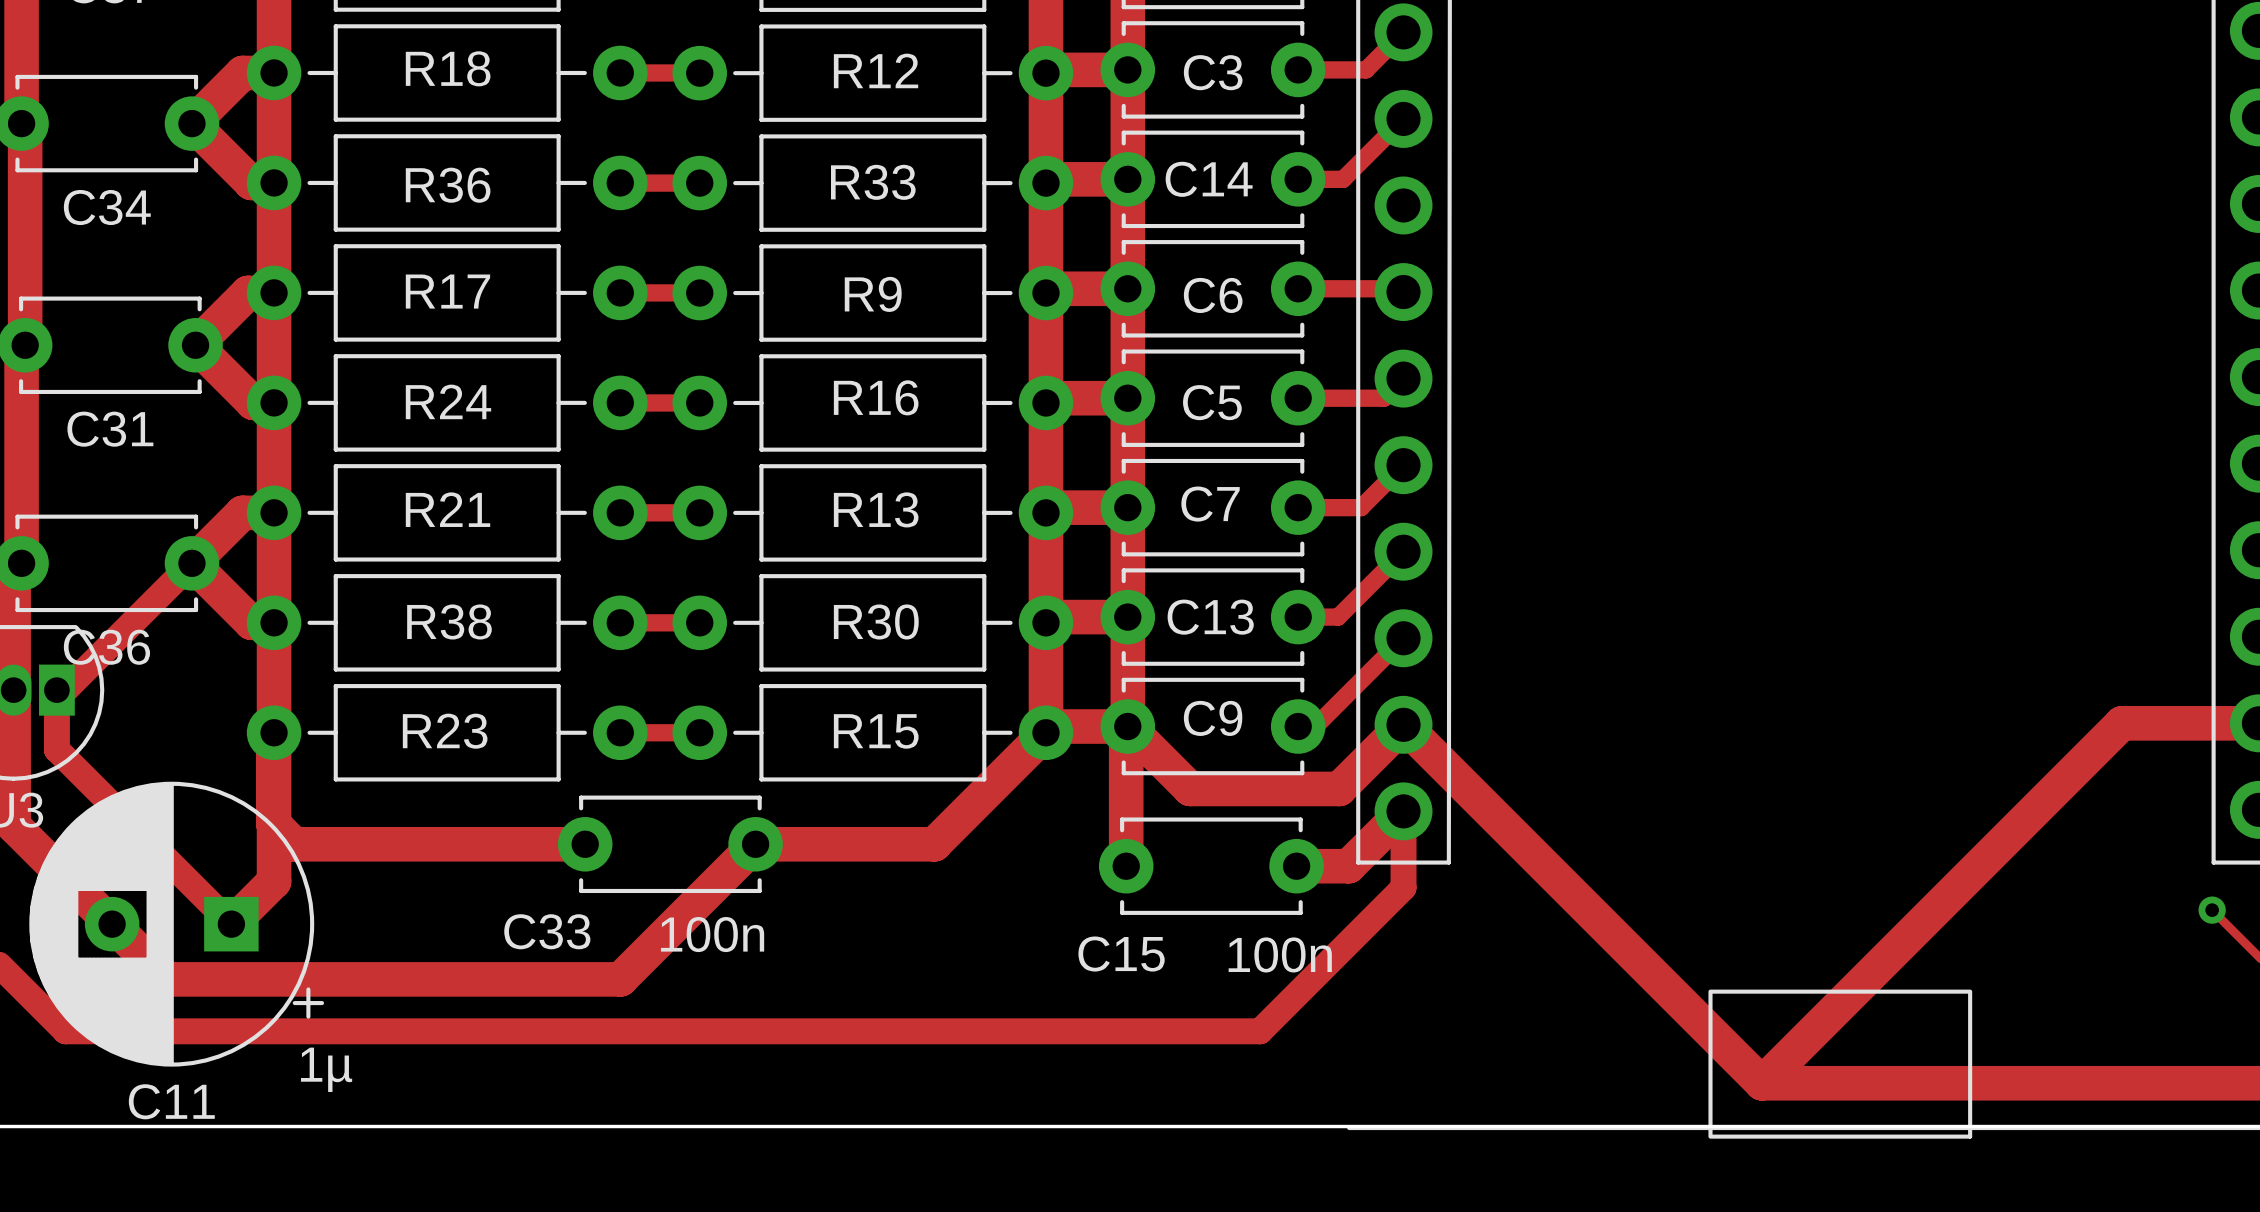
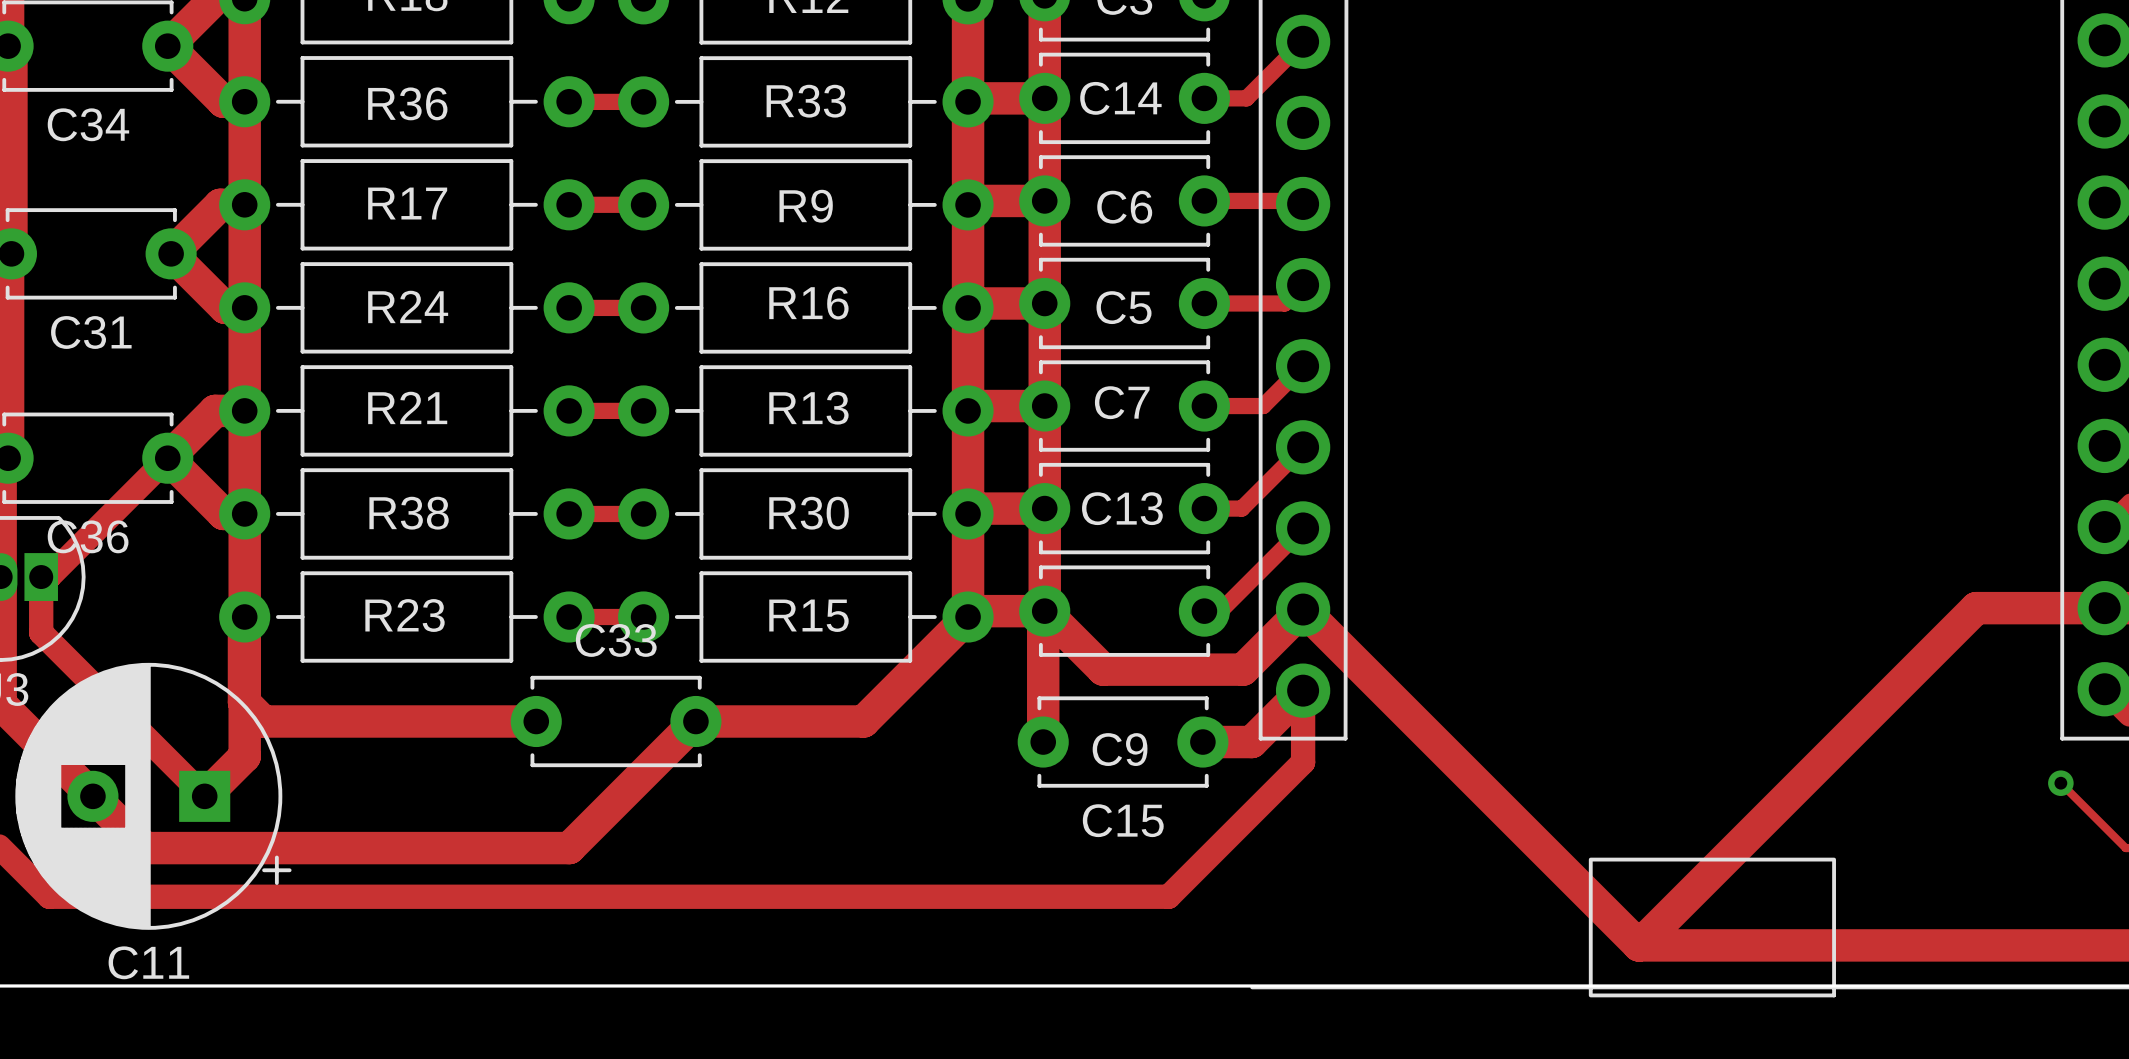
C9 name position: C9 (1213, 718) -> C9 (1120, 749)
C33 name position: C33 (547, 931) -> C33 (616, 640)
C33 value: 100n (712, 934) -> none
C15 name position: C15 (1121, 954) -> C15 (1123, 820)
C15 value: 100n (1280, 954) -> none
C11 value: 1µ (326, 1069) -> none

